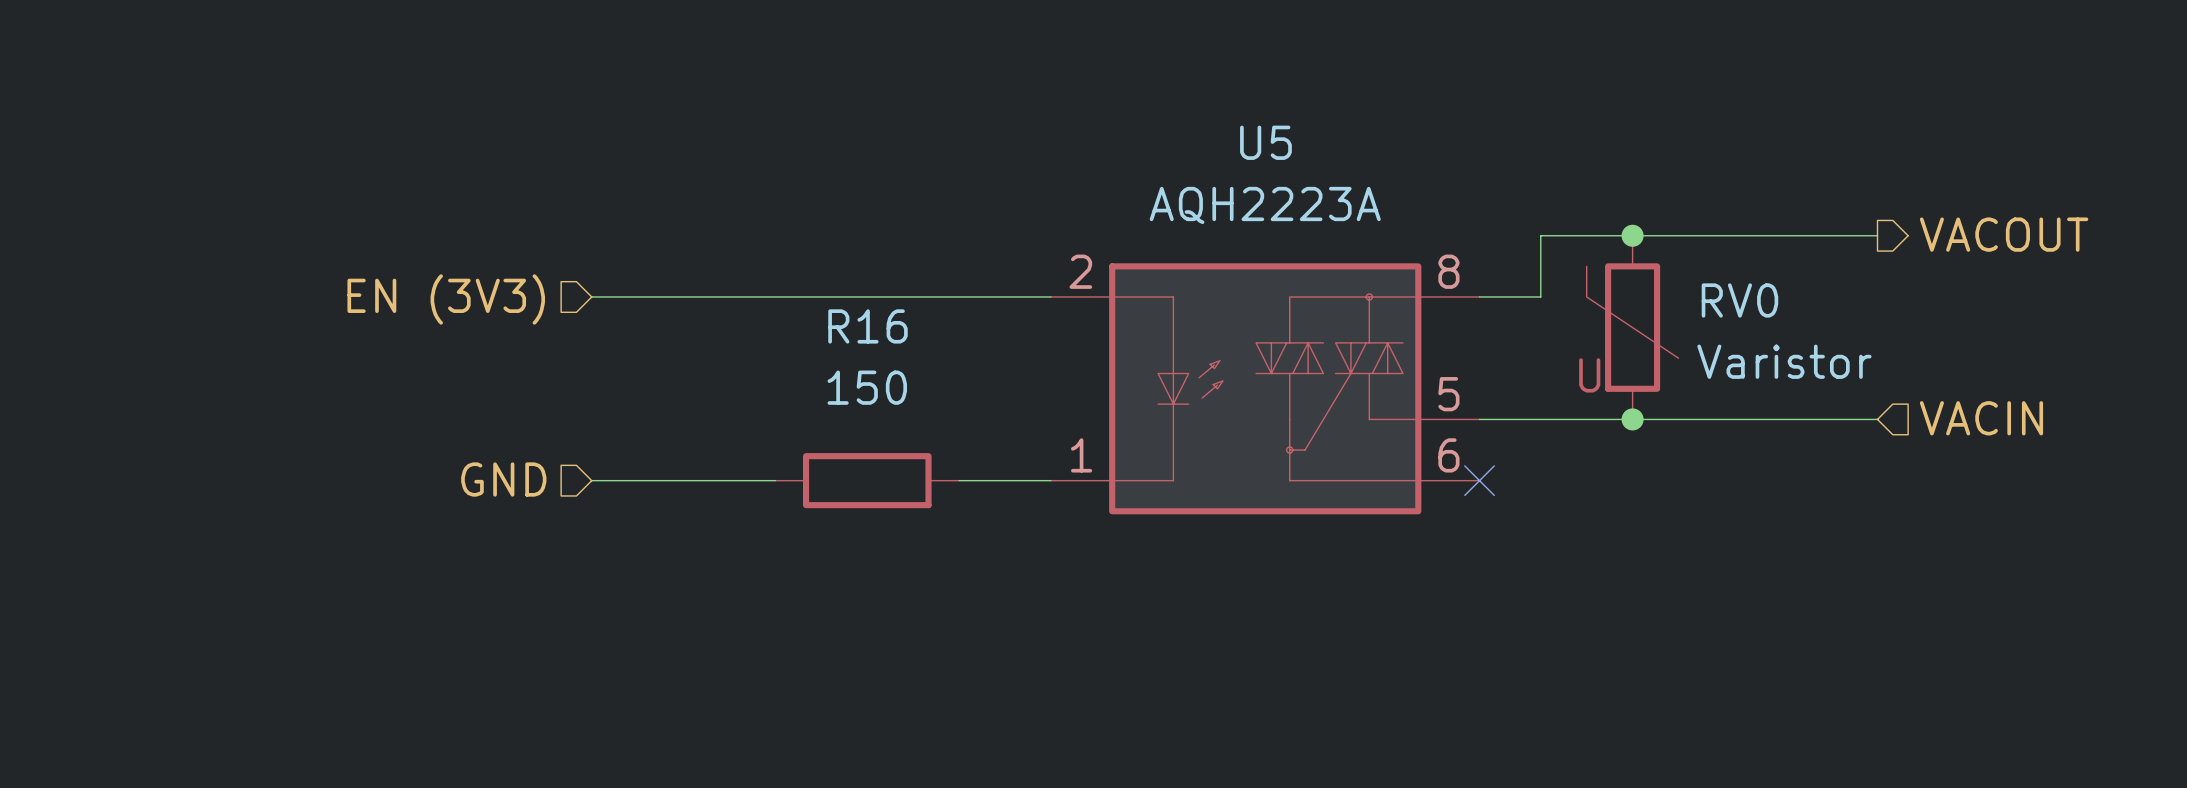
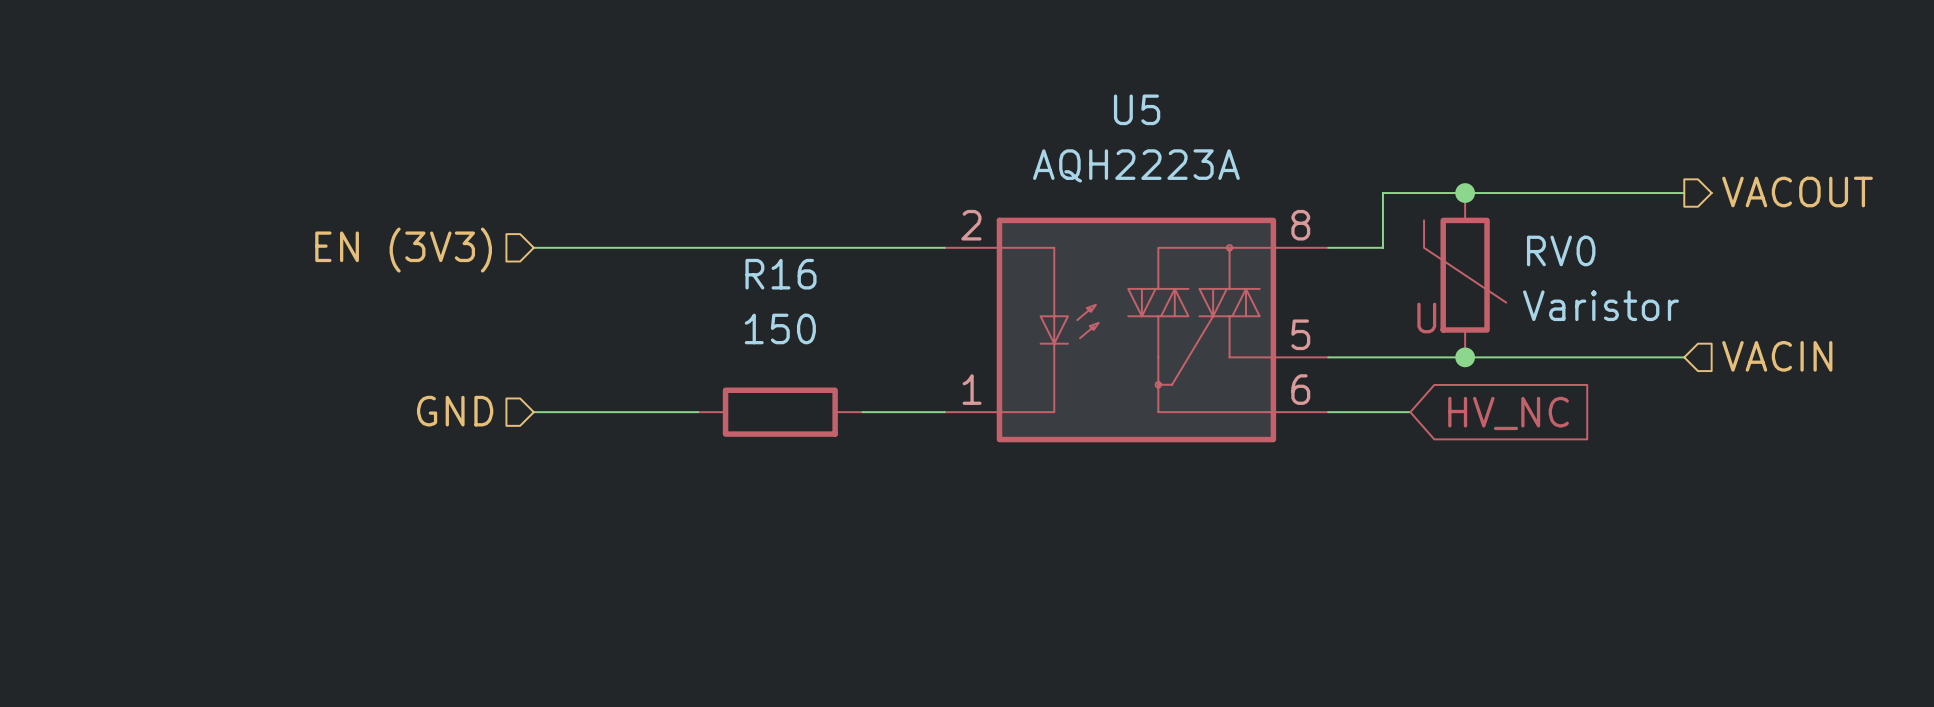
wire: none -> (1328, 412) (1410, 412)
no-connect mark: (1479, 480) -> none
global label: none -> HV_NC (1508, 413)

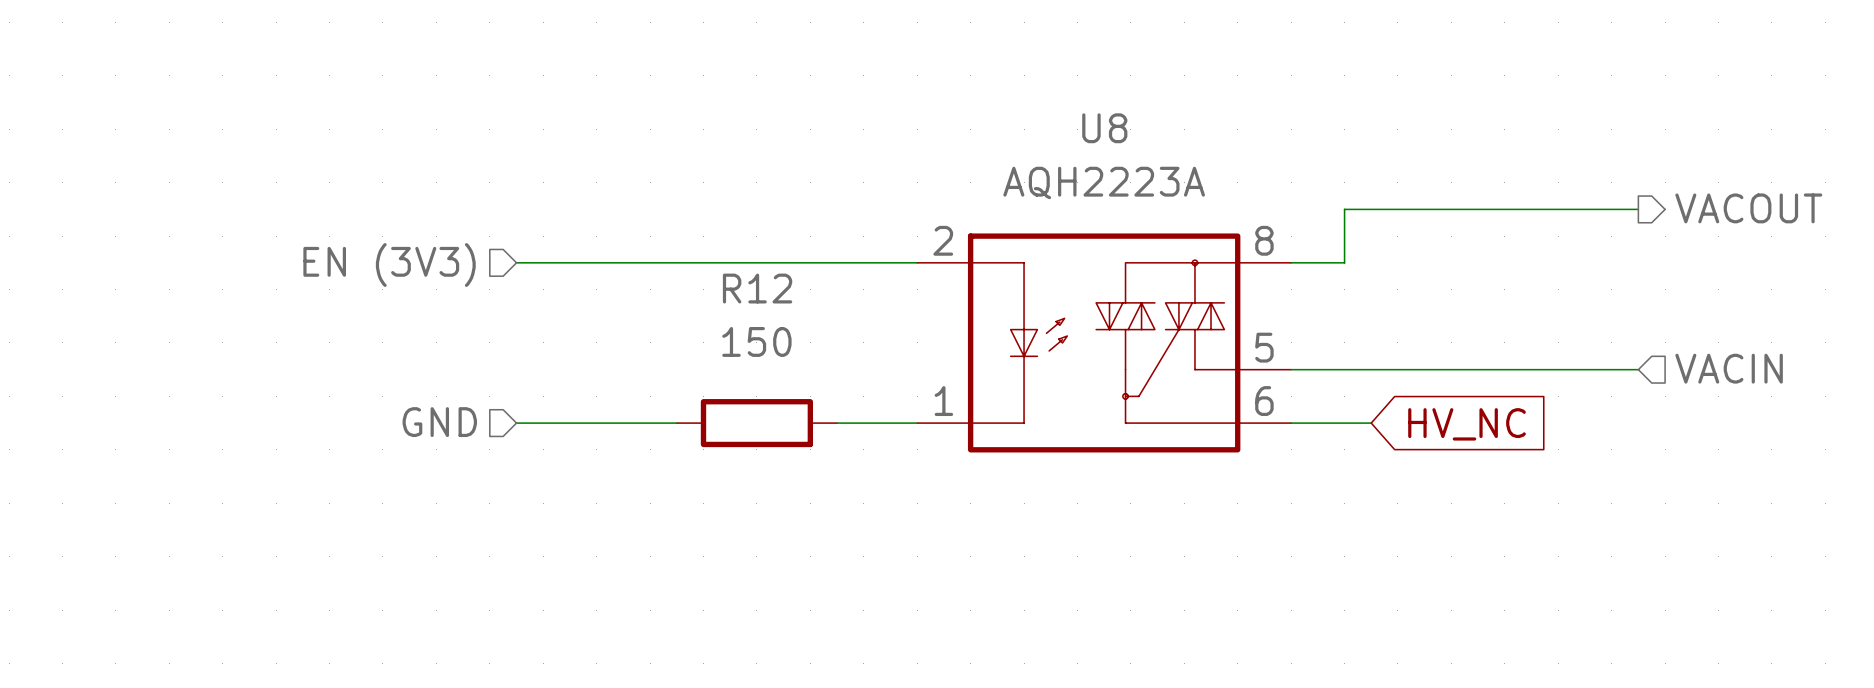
U5 name: U5 (1137, 109) -> U8 (1104, 128)
junction: (1465, 193) -> none
R16 name: R16 (780, 274) -> R12 (757, 288)
RV0: Varistor (1465, 275) -> none
junction: (1465, 357) -> none

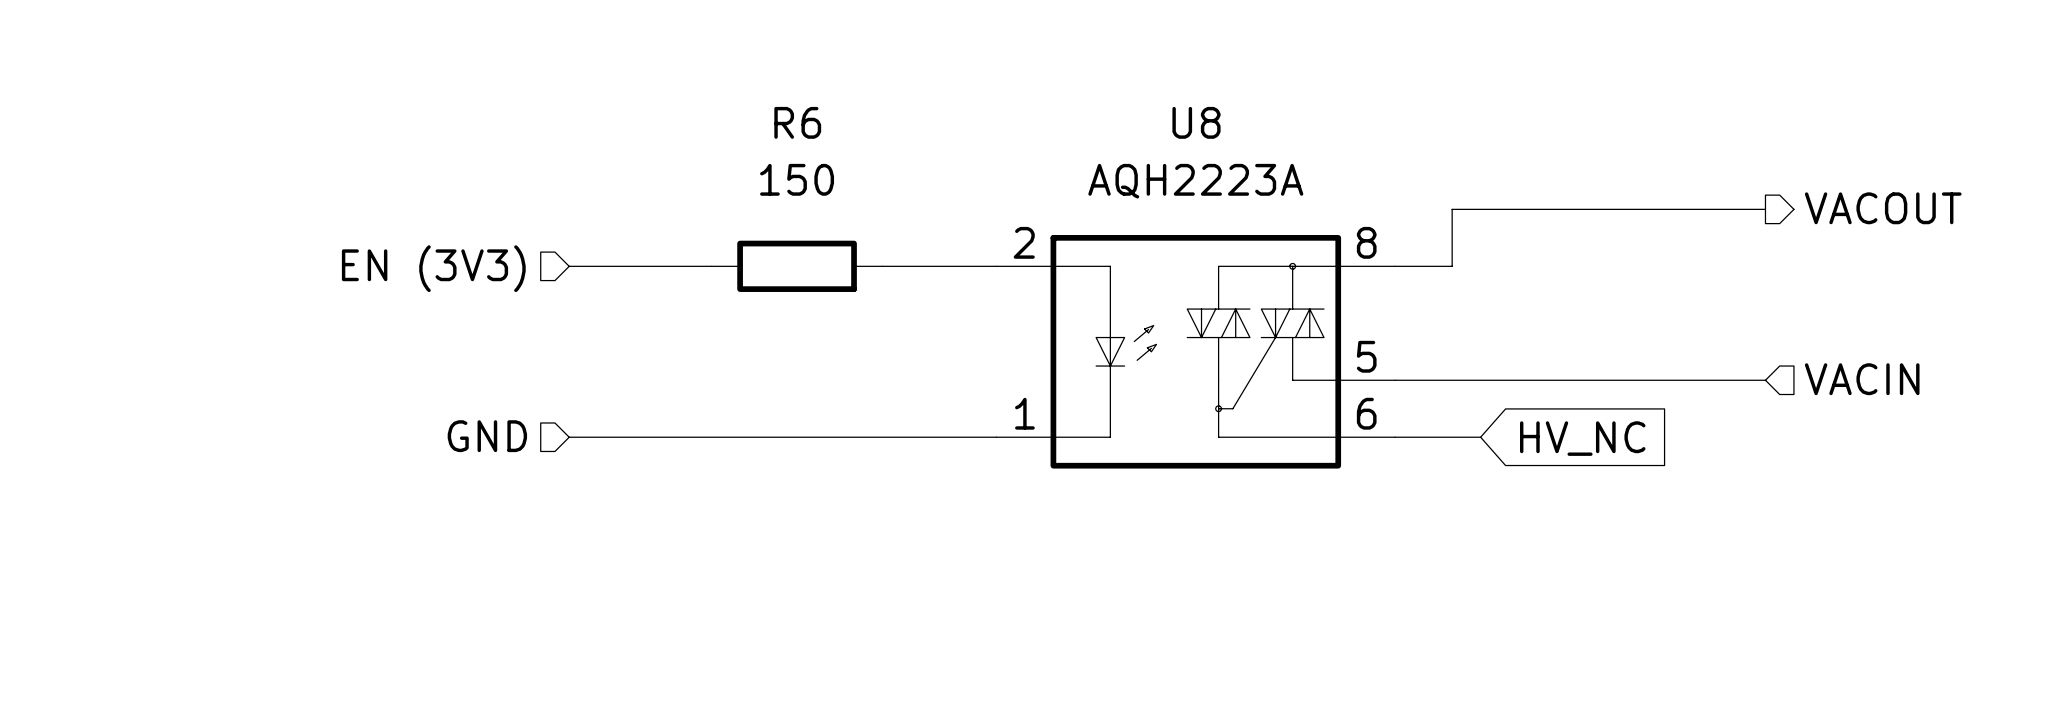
wire: (650, 262) (810, 262) -> (740, 437) (910, 437)
R6: none -> 150 (797, 266)
R12: 150 (756, 423) -> none

